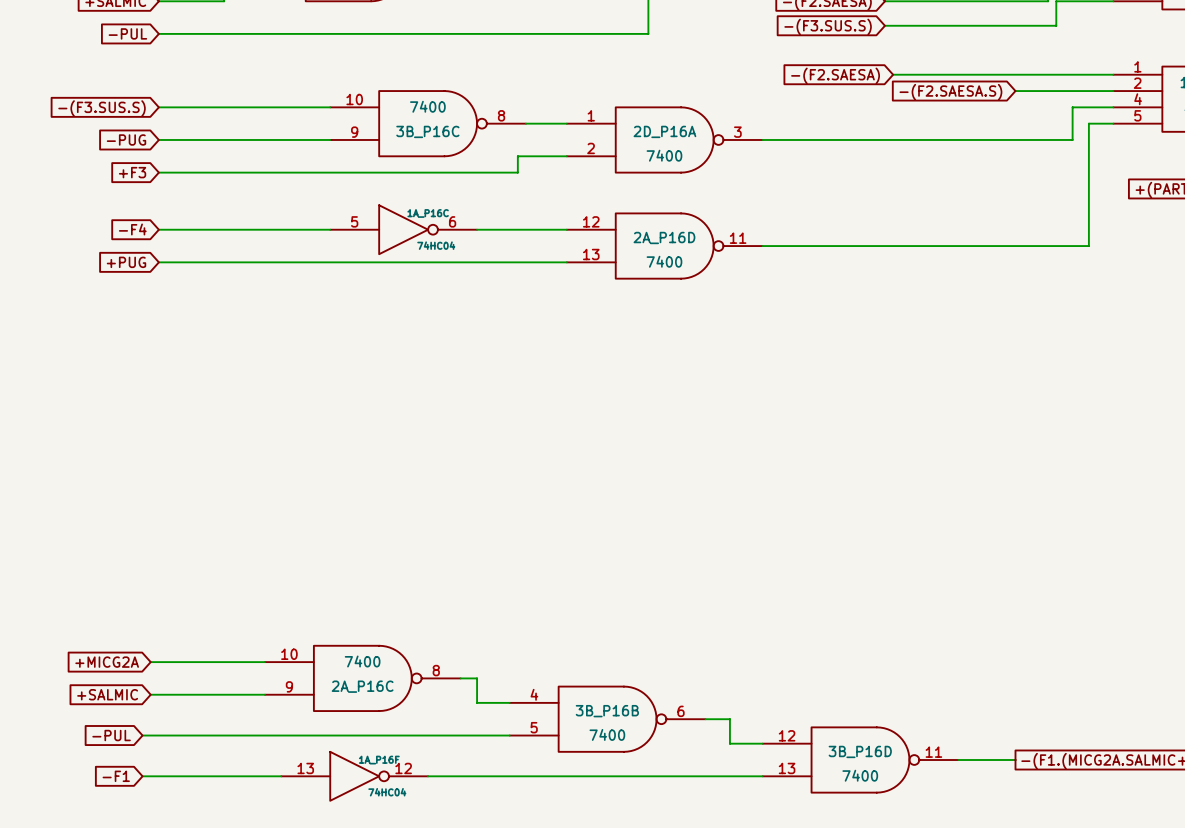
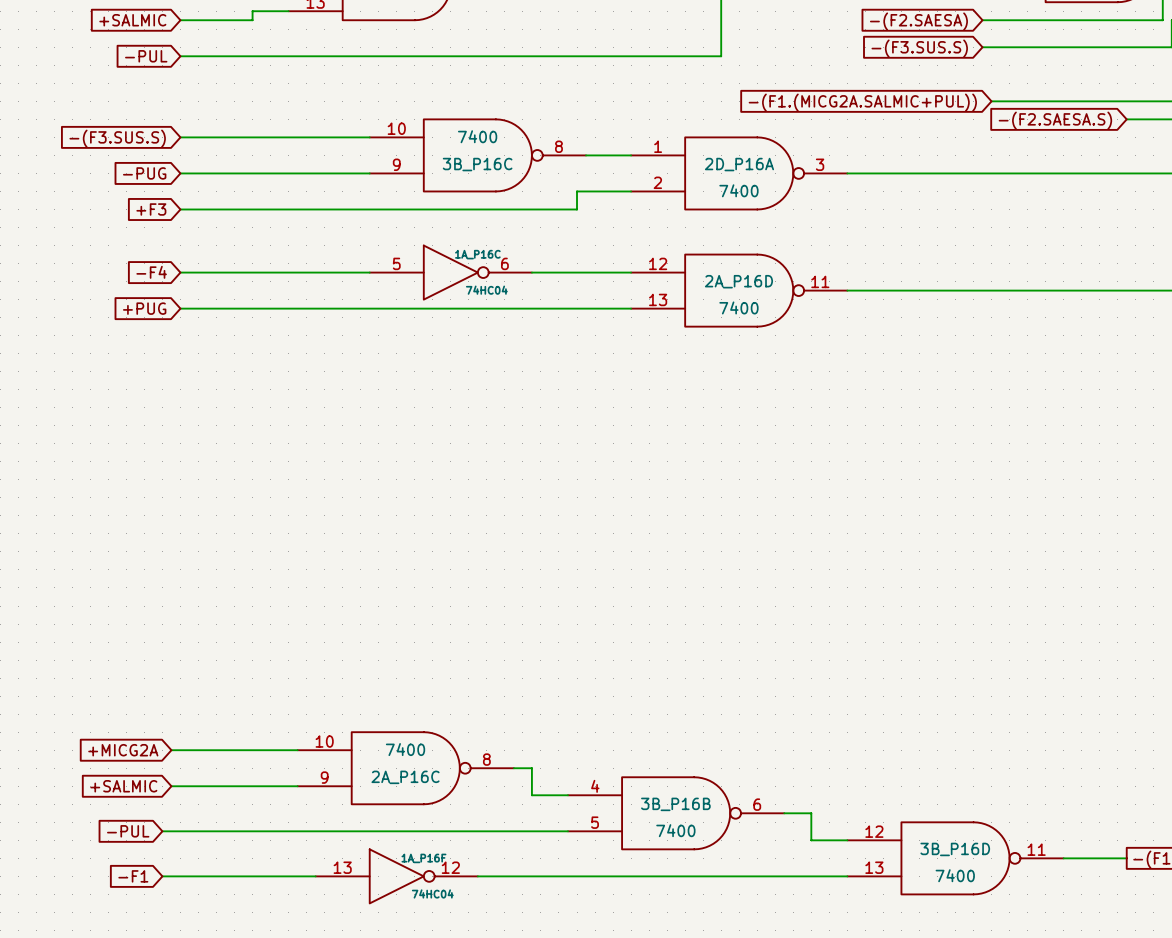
global label: -(F2.SAESA) (835, 75) -> -(F1.(MICG2A.SALMIC+PUL)) (862, 102)

